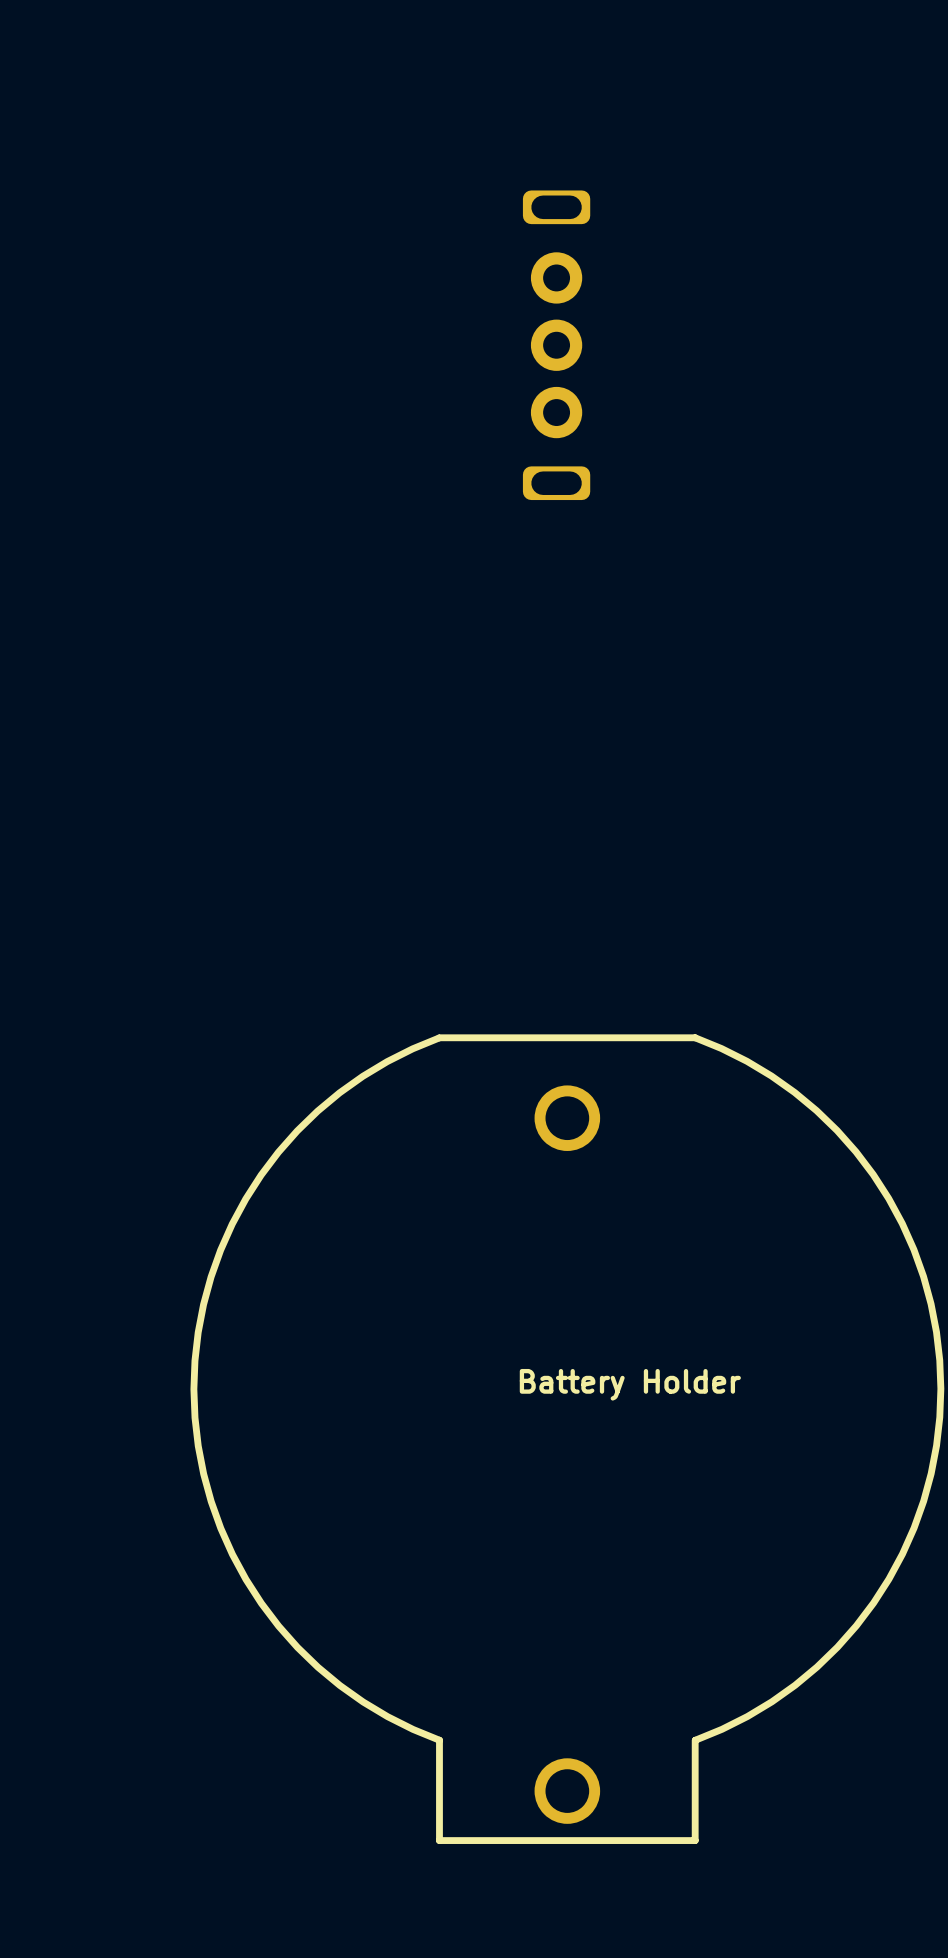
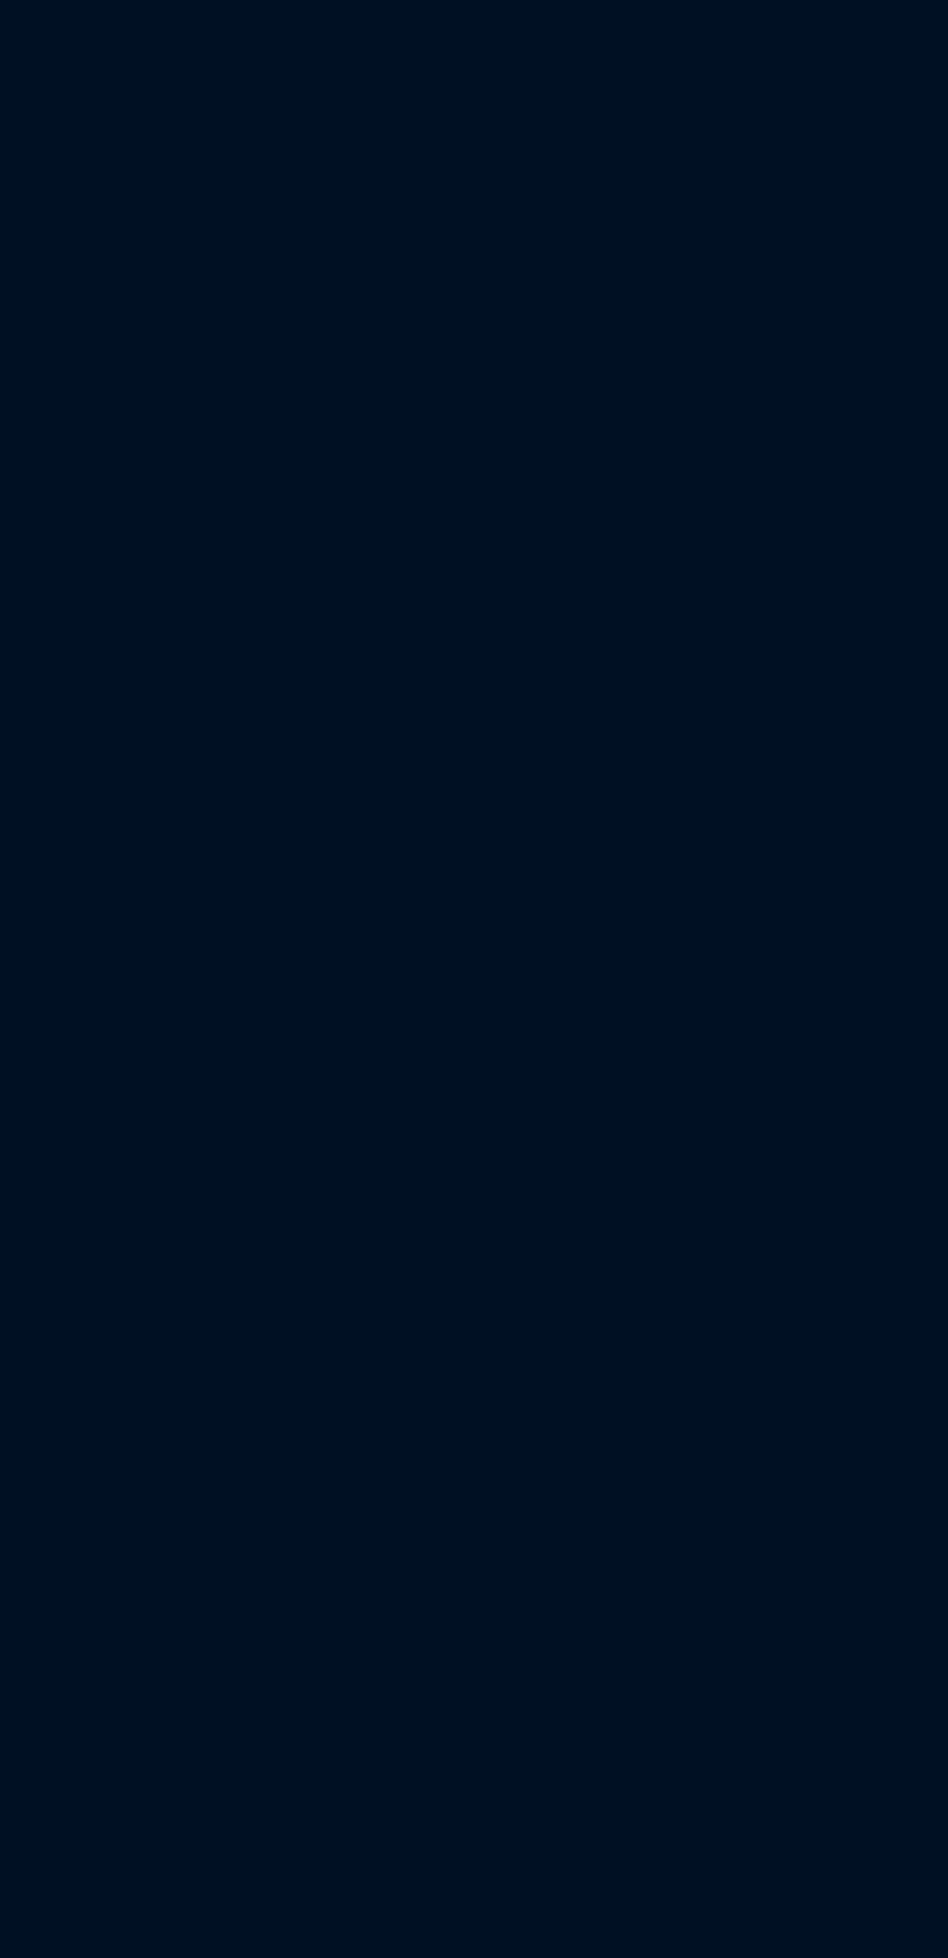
part: (556, 345) -> none
part: Battery Holder (567, 1439) -> none

